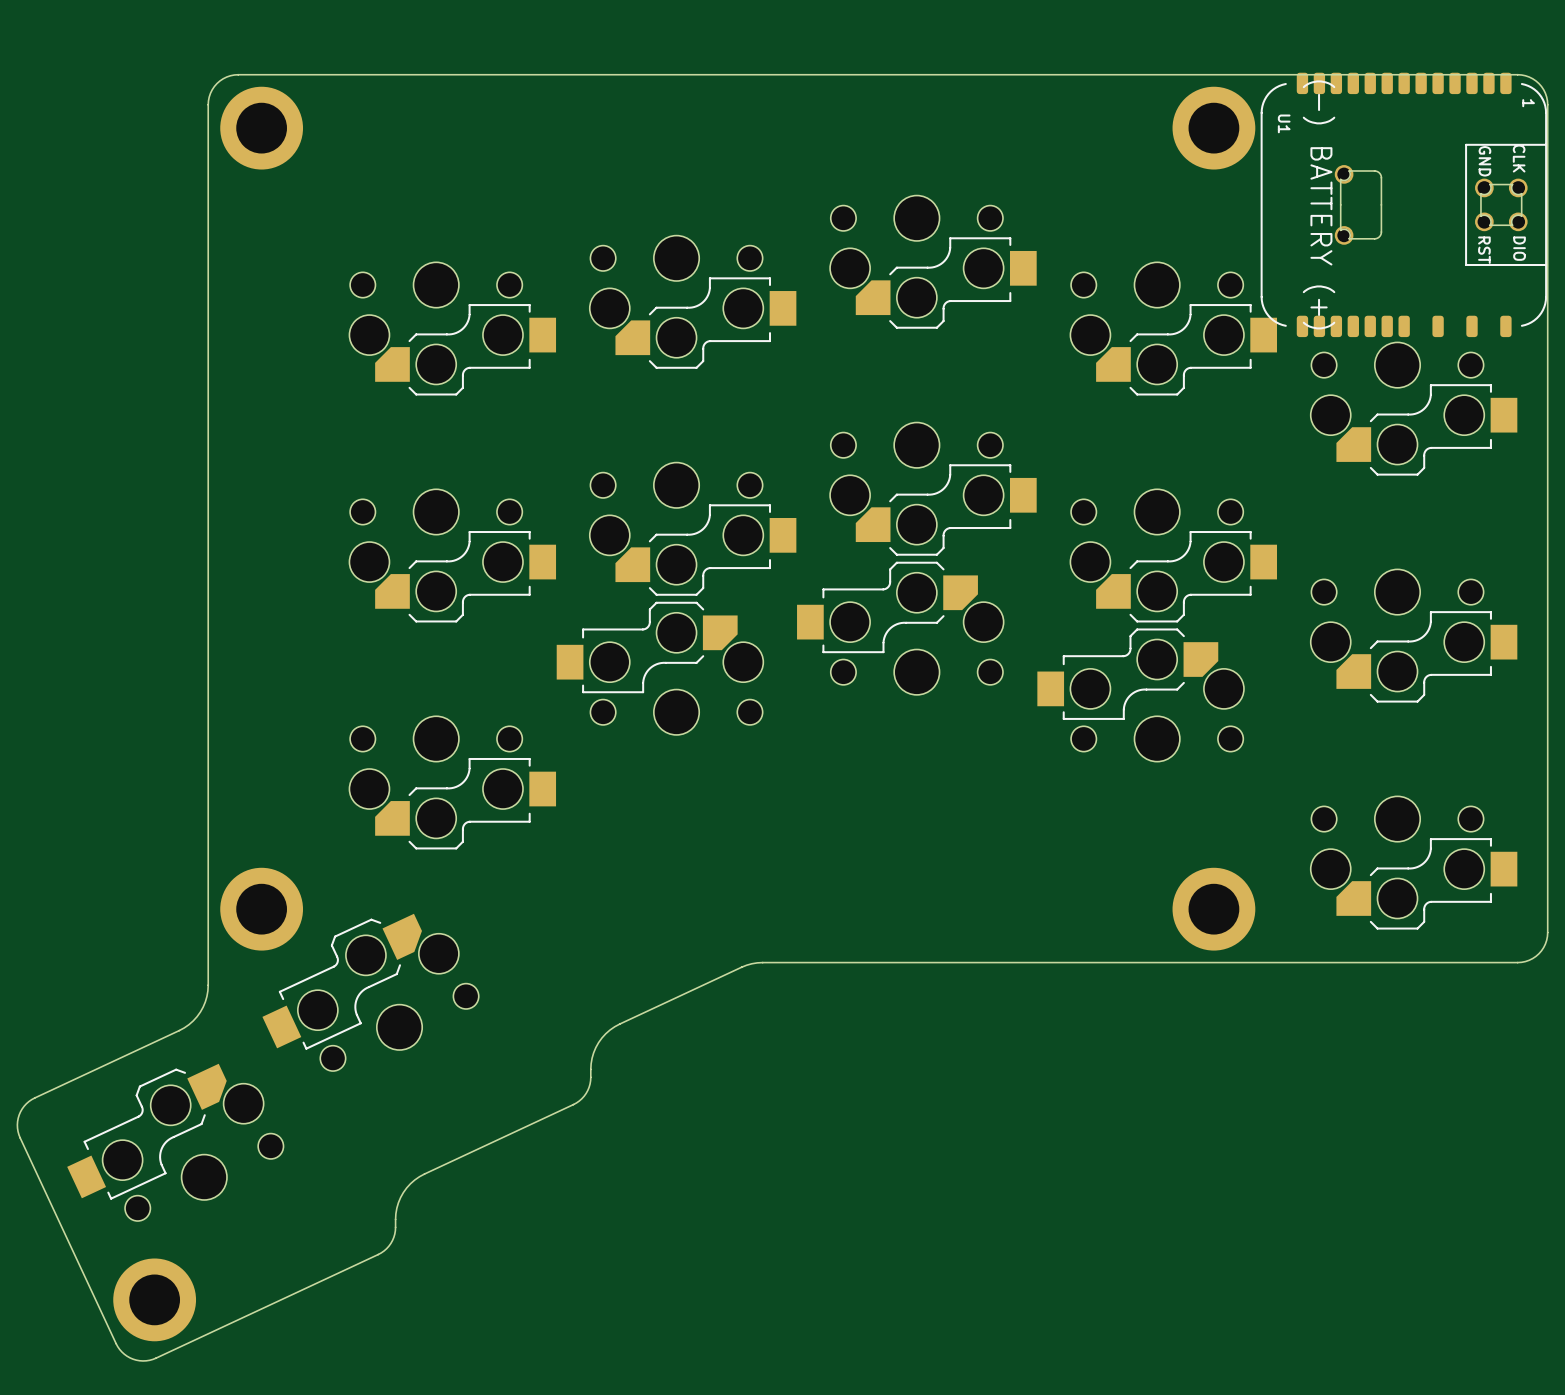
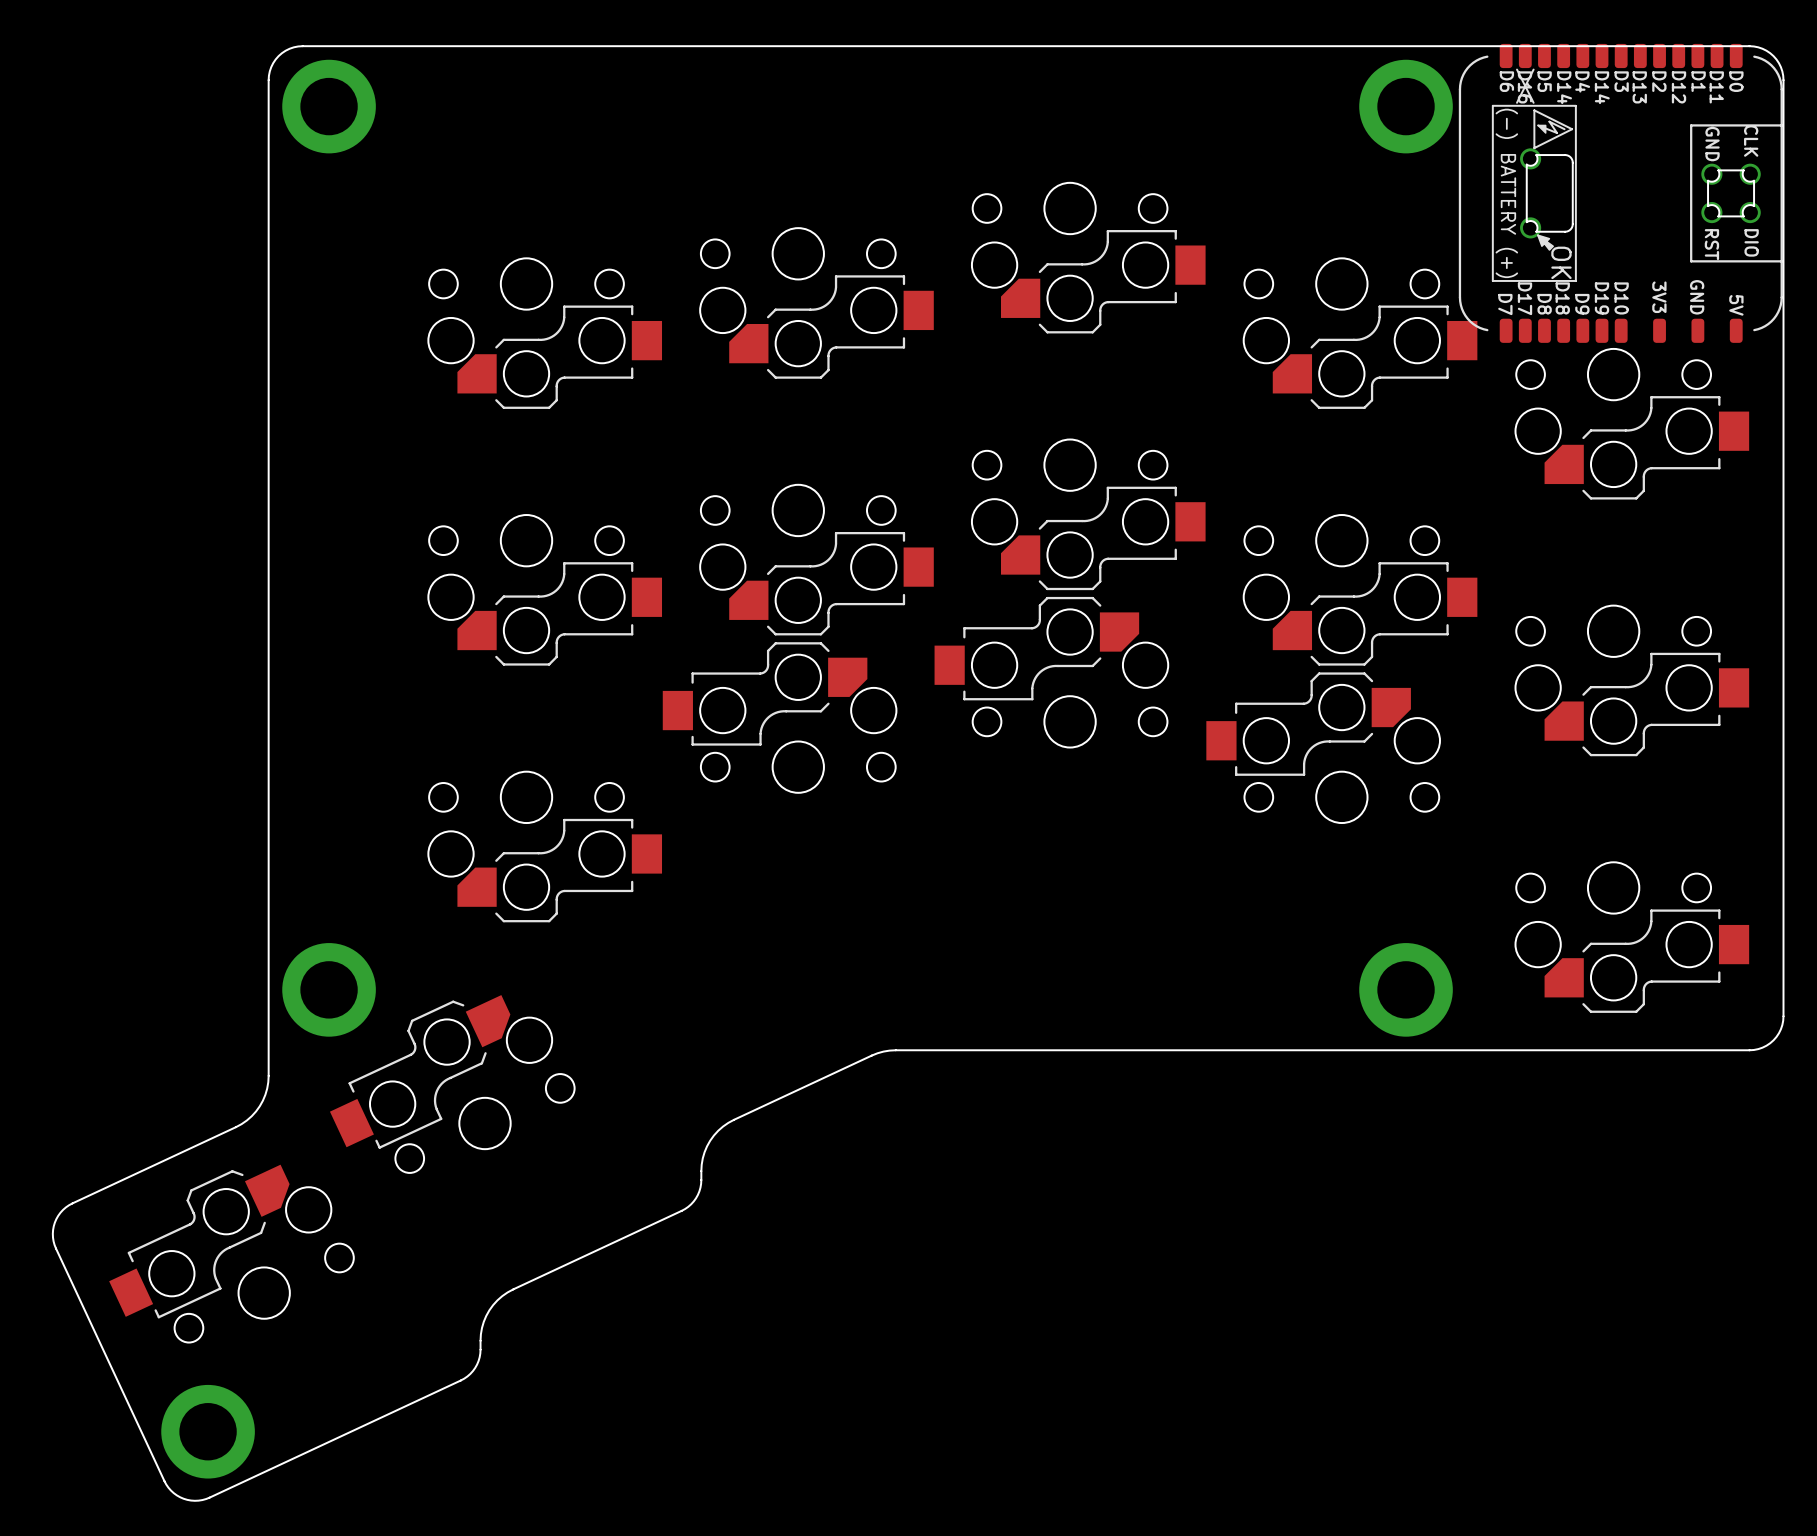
U1: (1403, 204) -> none
part: none -> (1620, 193)

